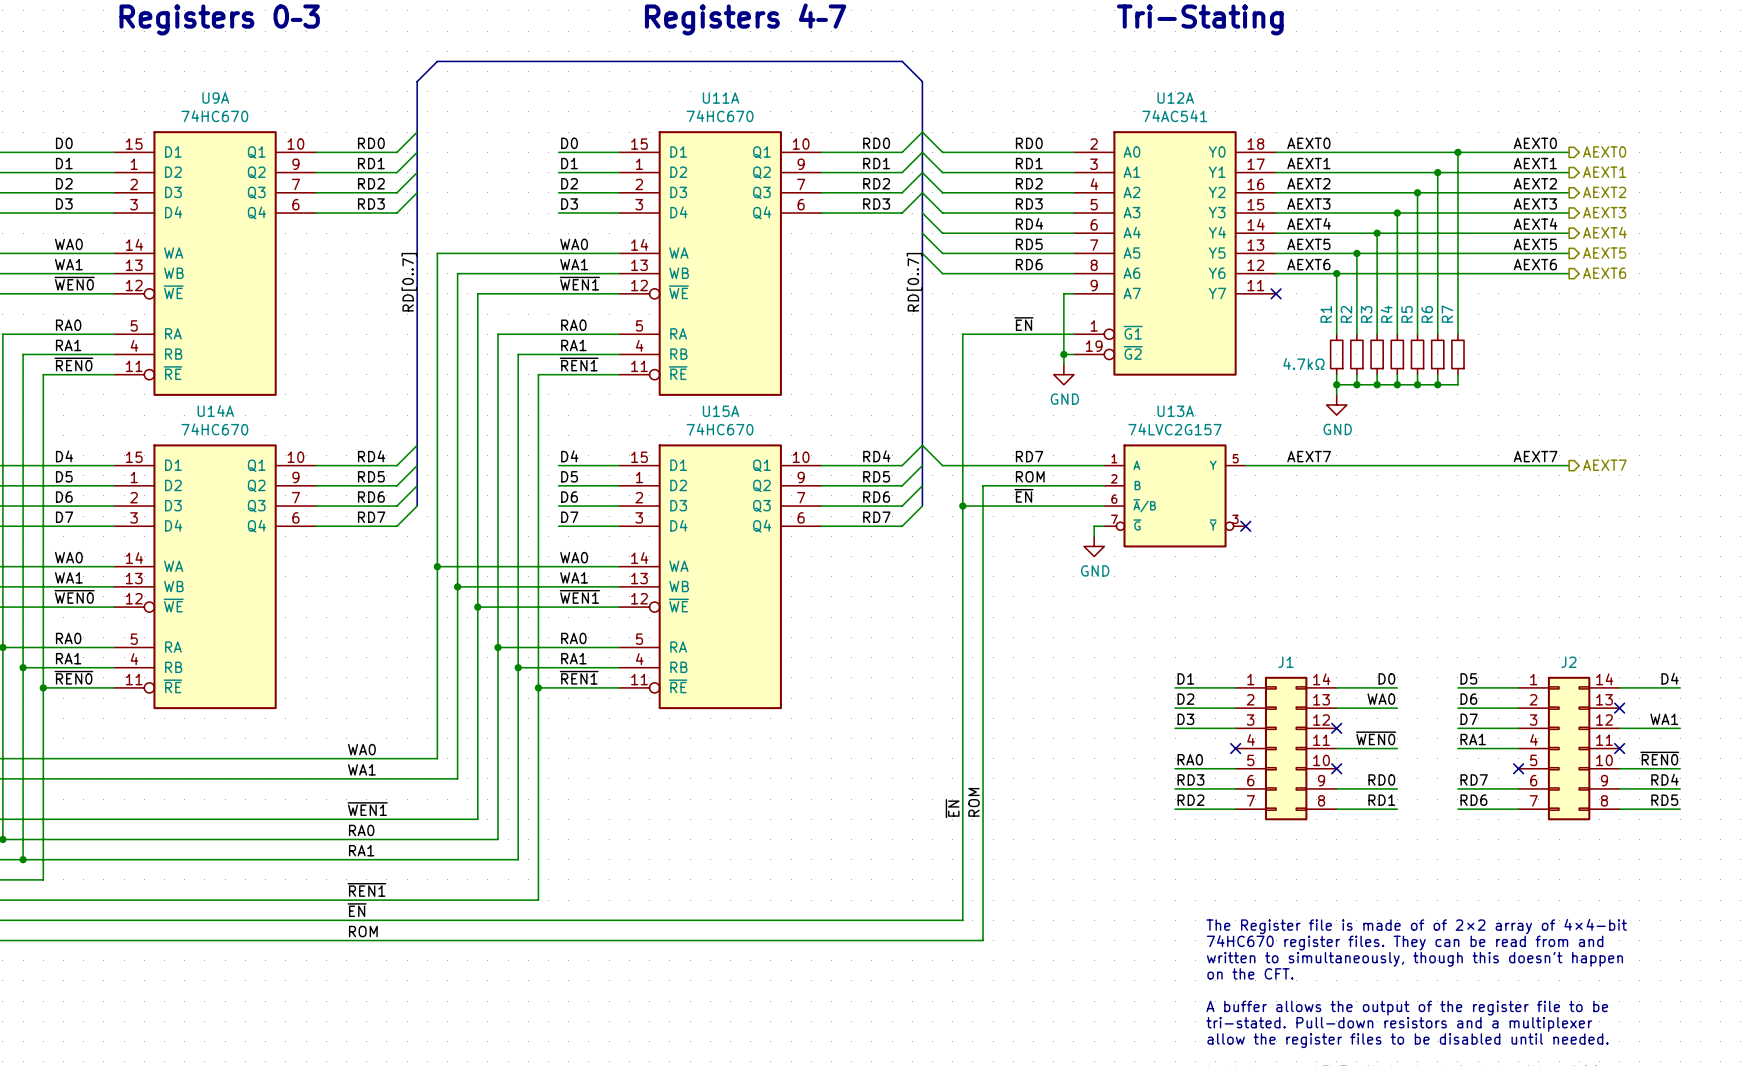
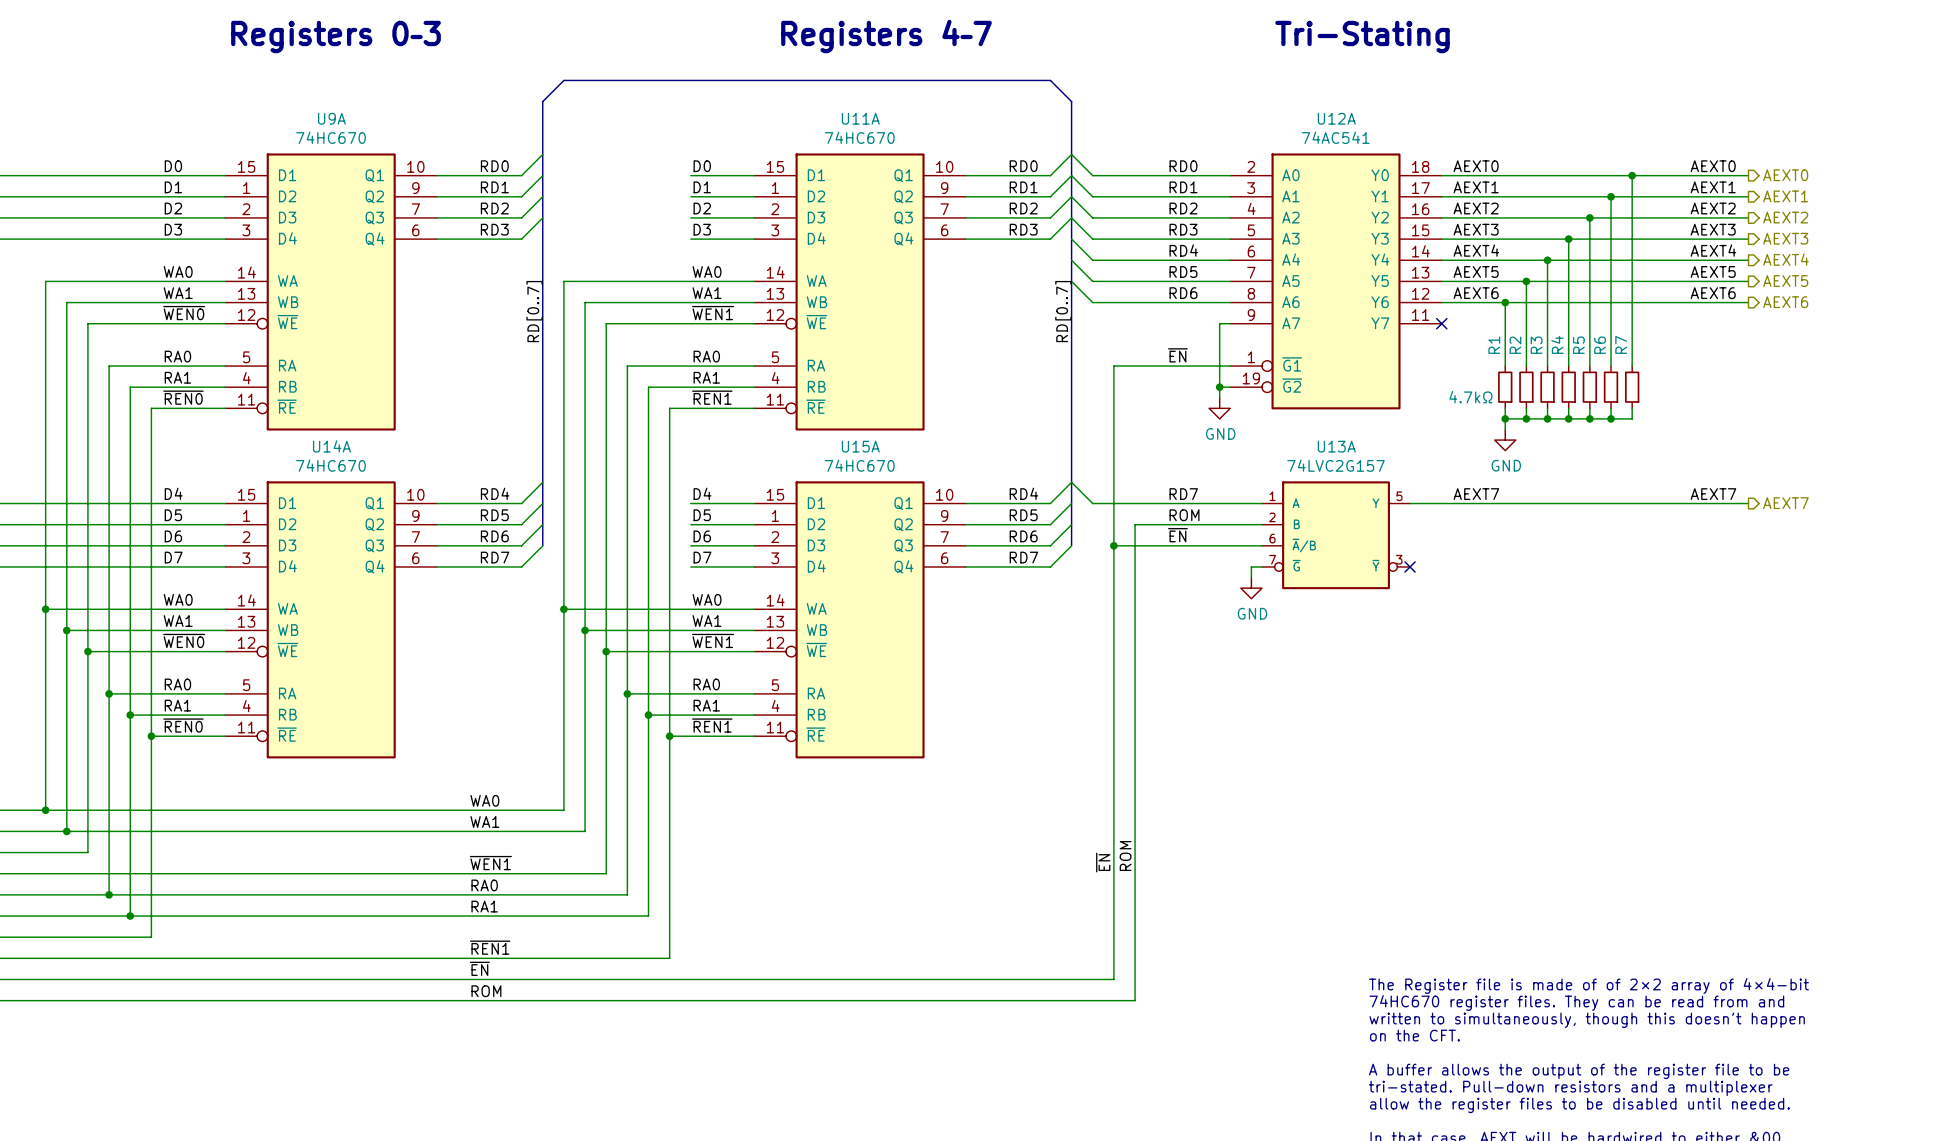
label: D1 (1185, 678) -> none
label: D0 (1386, 678) -> none
label: D5 (1468, 678) -> none
label: D4 (1670, 678) -> none
wire: (1175, 687) (1235, 687) -> none
wire: (1336, 687) (1397, 687) -> none
wire: (1457, 687) (1518, 687) -> none
wire: (1619, 687) (1680, 687) -> none
label: D2 (1185, 699) -> none
label: WA0 (1381, 699) -> none
label: D6 (1468, 699) -> none
wire: (1175, 708) (1235, 708) -> none
wire: (1336, 708) (1397, 708) -> none
wire: (1457, 708) (1518, 708) -> none
no-connect mark: (1619, 708) -> none
label: D3 (1185, 719) -> none
label: D7 (1469, 719) -> none
label: WA1 (1664, 719) -> none
wire: (1175, 728) (1235, 728) -> none
no-connect mark: (1336, 728) -> none
wire: (1457, 728) (1518, 728) -> none
wire: (1619, 728) (1680, 728) -> none
label: ~{WEN0} (1376, 738) -> none
label: RA1 (1473, 739) -> none
no-connect mark: (1235, 748) -> none
J1: (1286, 748) -> none
wire: (1336, 748) (1397, 748) -> none
wire: (1457, 748) (1518, 748) -> none
J2: (1569, 748) -> none
no-connect mark: (1619, 748) -> none
label: ~{REN0} (1659, 758) -> none
label: RA0 (1190, 759) -> none
wire: (1175, 768) (1235, 768) -> none
no-connect mark: (1336, 768) -> none
no-connect mark: (1518, 768) -> none
wire: (1619, 768) (1680, 768) -> none
label: RD3 (1190, 779) -> none
label: RD0 (1381, 779) -> none
label: RD7 (1474, 779) -> none
label: RD4 (1665, 779) -> none
wire: (1175, 788) (1235, 788) -> none
wire: (1336, 788) (1397, 788) -> none
wire: (1457, 788) (1518, 788) -> none
wire: (1619, 788) (1680, 788) -> none
label: RD2 (1190, 800) -> none
label: RD1 (1381, 800) -> none
label: RD6 (1473, 800) -> none
label: RD5 (1664, 800) -> none
wire: (1175, 809) (1235, 809) -> none
wire: (1336, 809) (1397, 809) -> none
wire: (1457, 809) (1518, 809) -> none
wire: (1619, 809) (1680, 809) -> none

